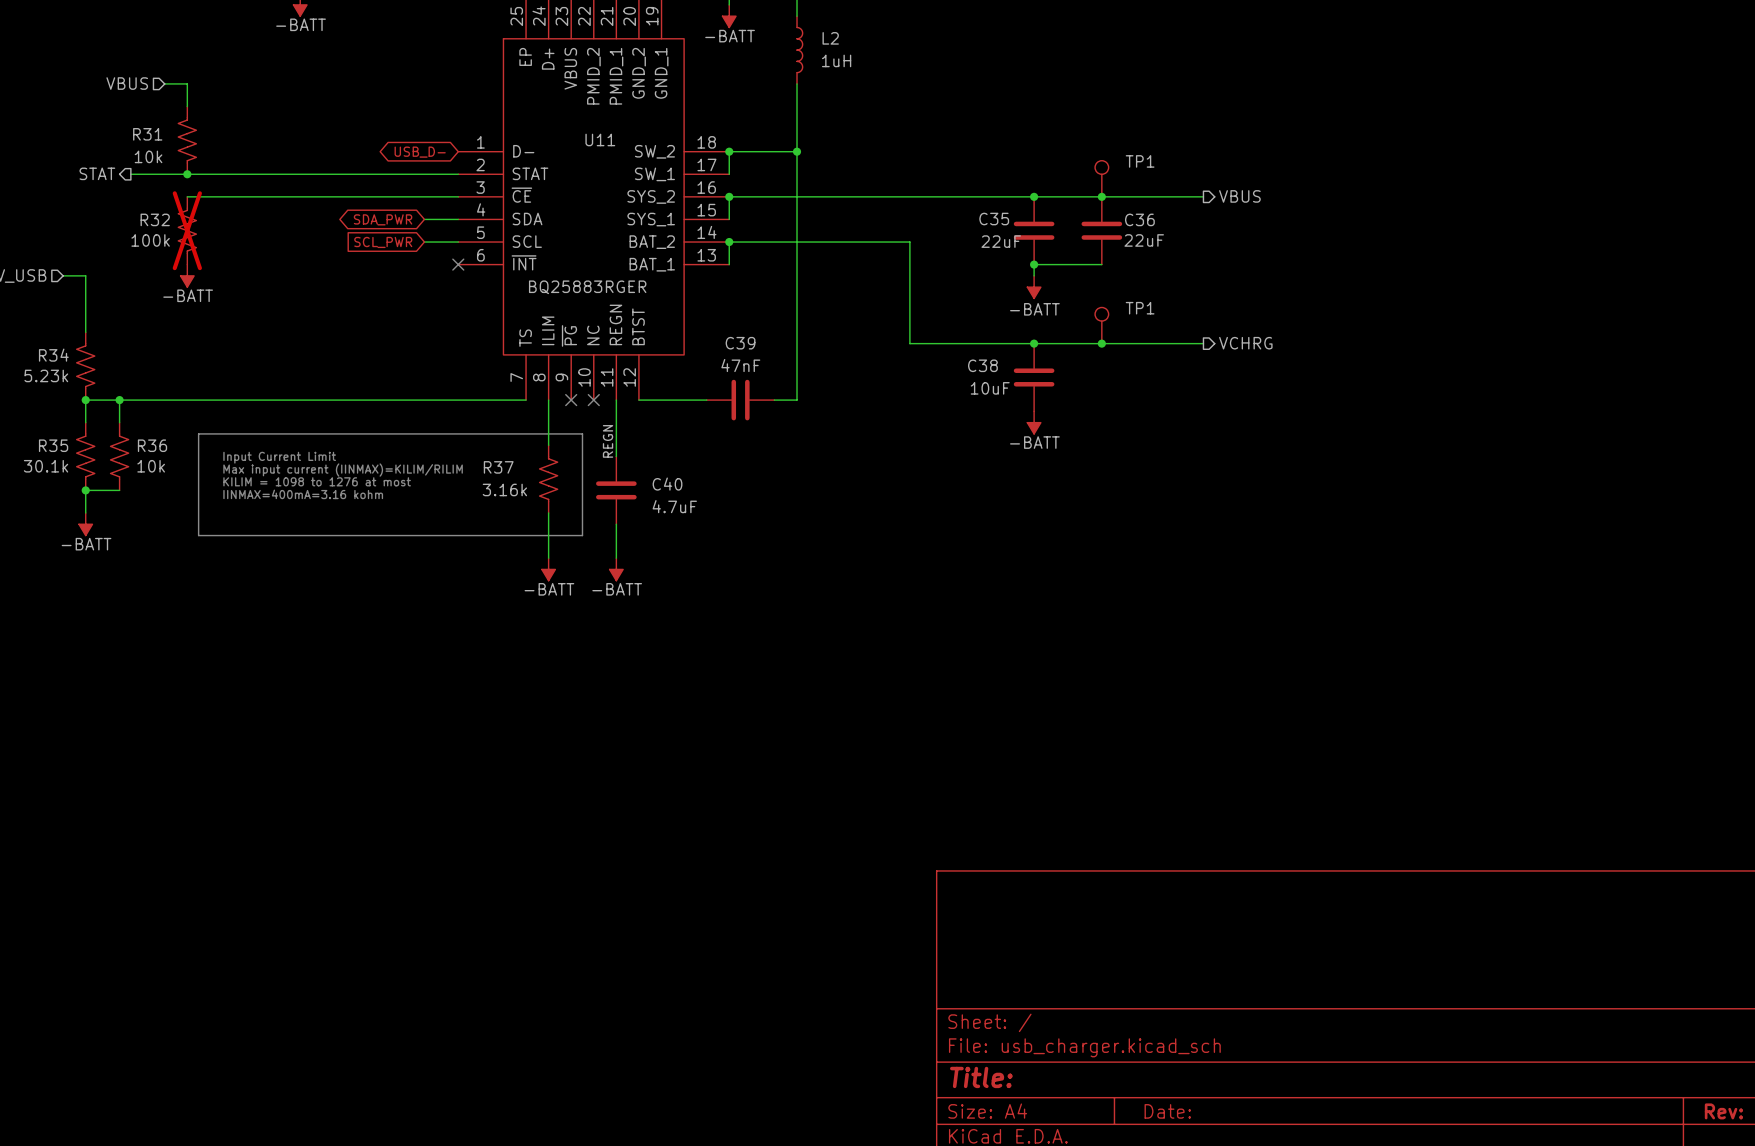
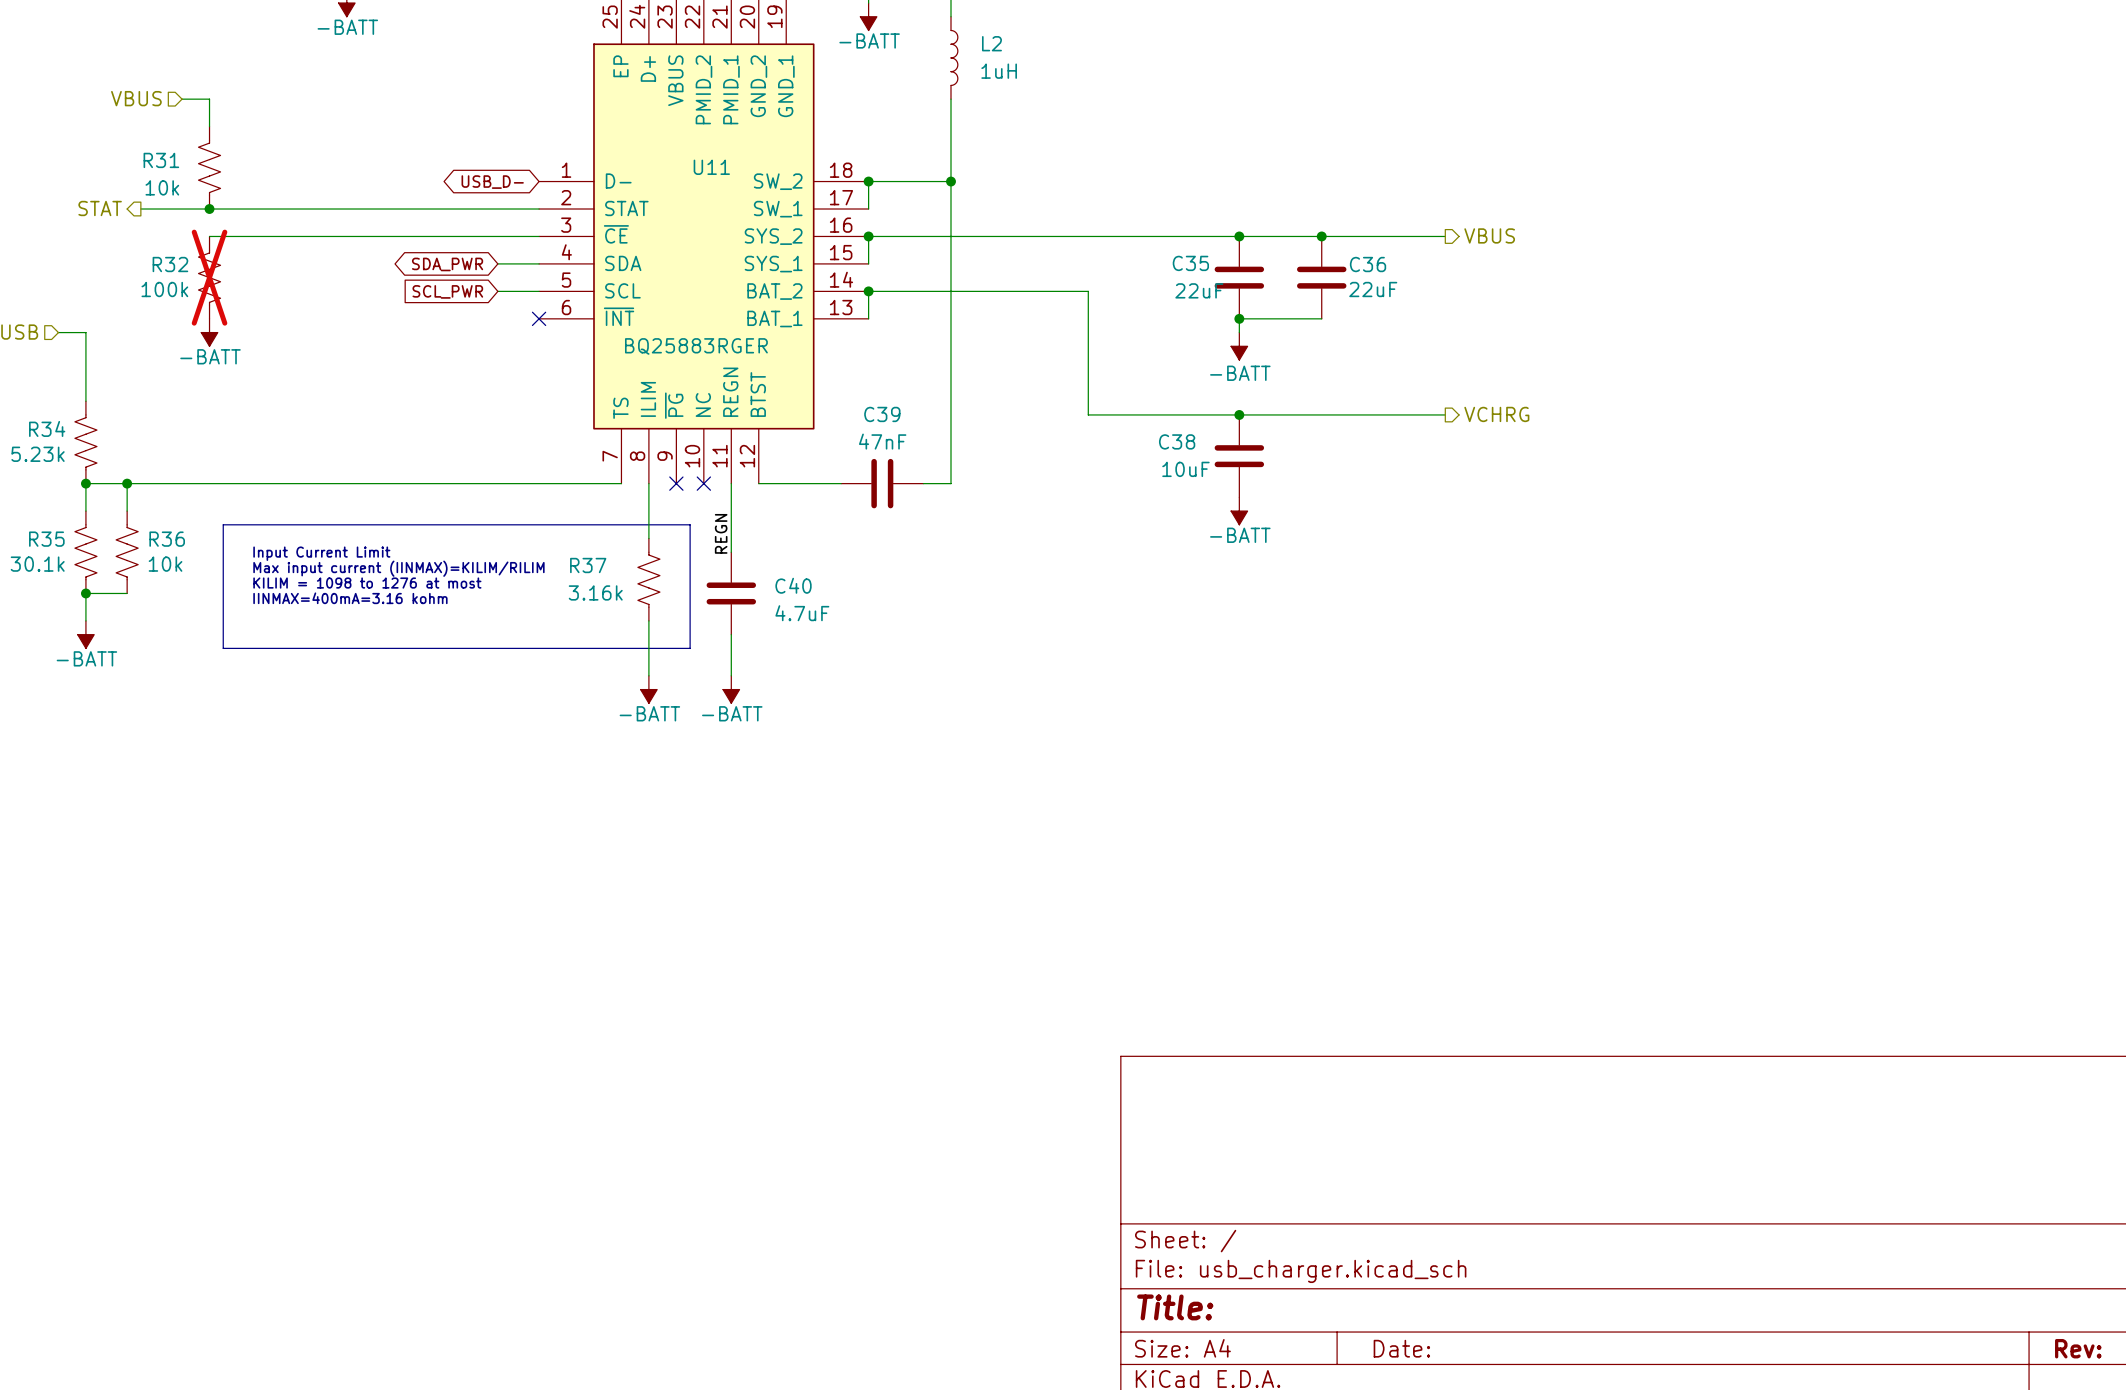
TP1: (1101, 178) -> none
TP1: (1101, 325) -> none
junction: (1101, 343) -> none

